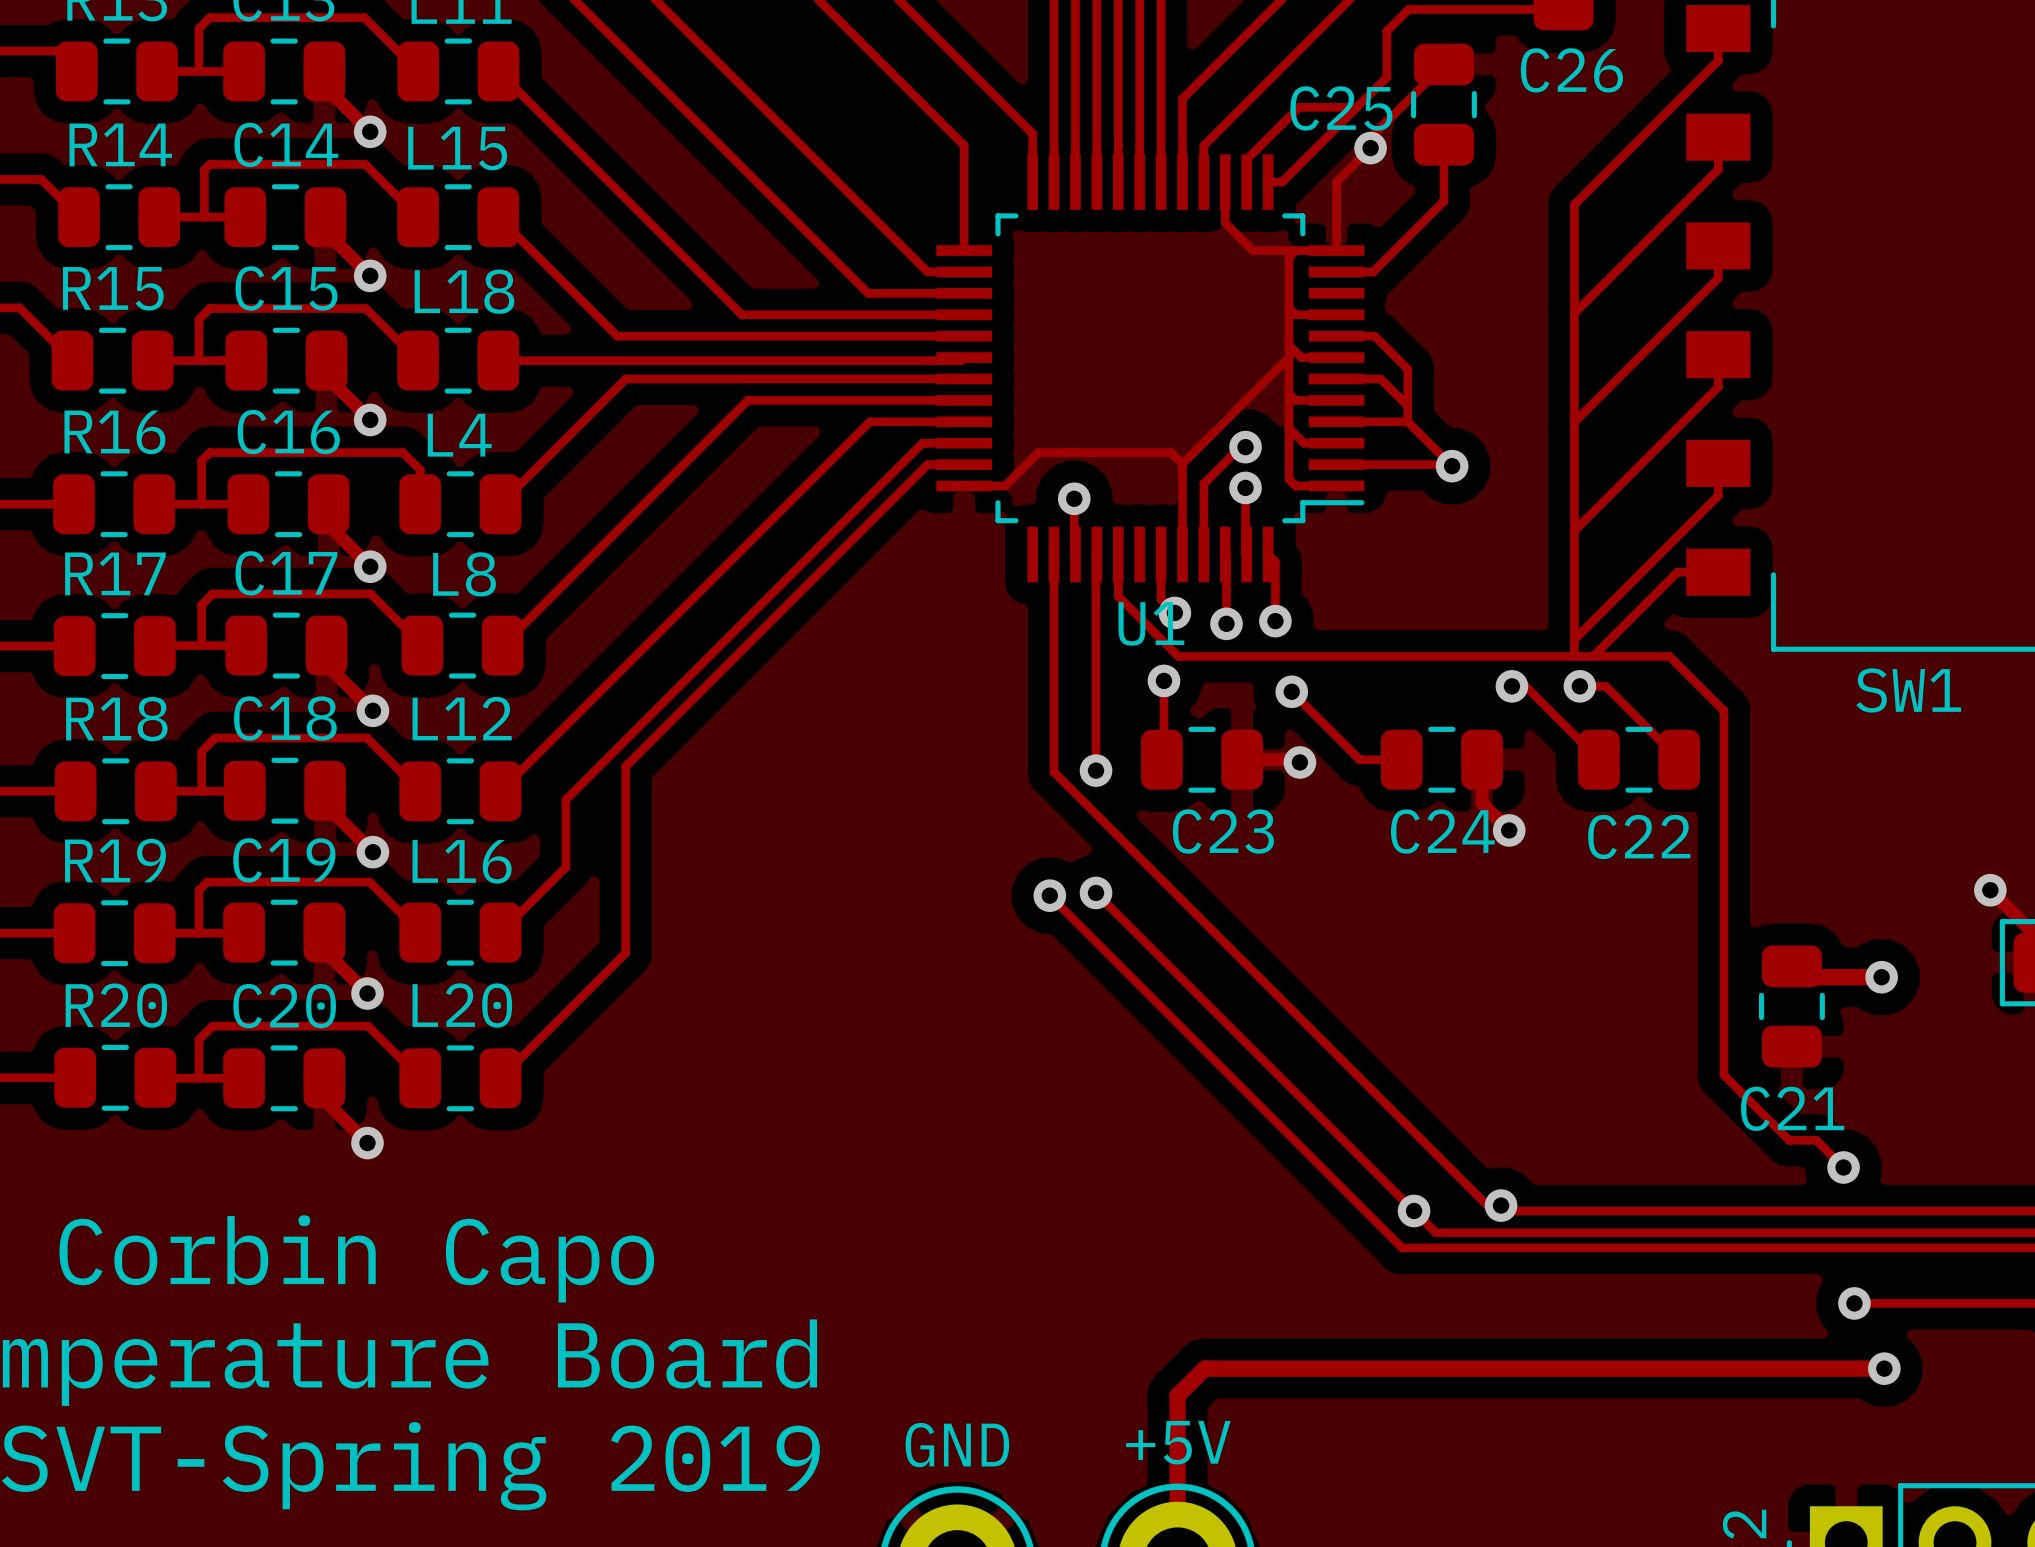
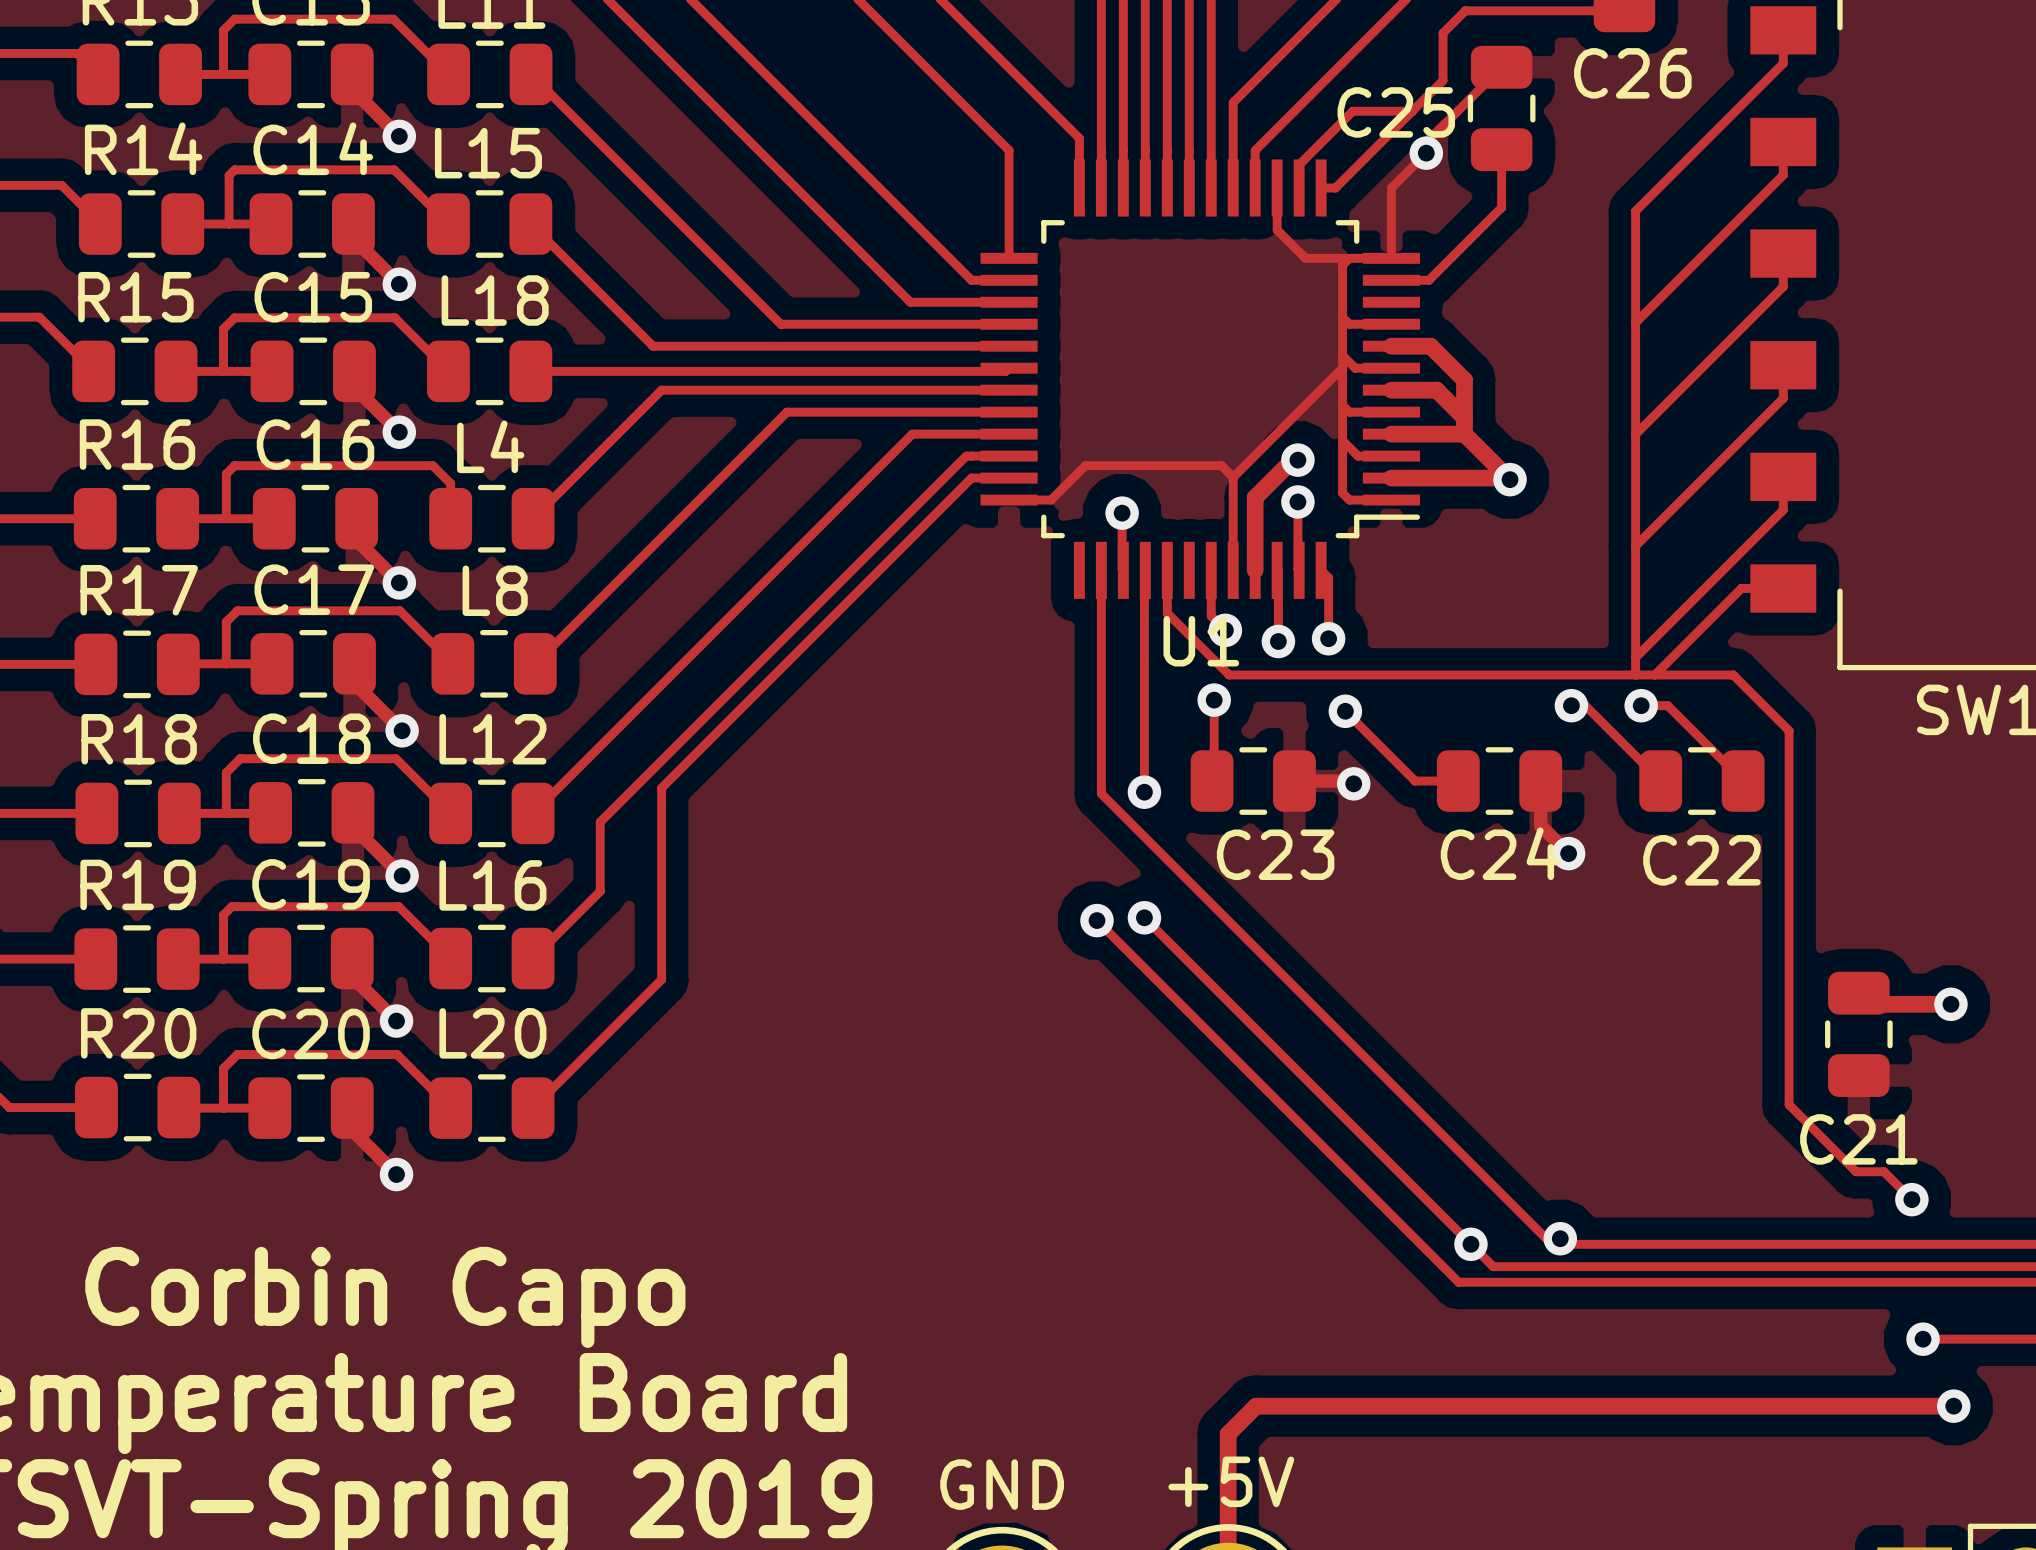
track width: thin (1336, 336) (1374, 336) (1407, 369) (1407, 421) -> thick (1391, 346) (1430, 346) (1464, 380) (1464, 434)
track width: thin (1336, 379) (1380, 379) (1407, 406) -> thick (1391, 390) (1436, 390) (1464, 417)
track width: thin (1336, 421) (1407, 421) -> thick (1391, 434) (1464, 434)
track width: thin (1407, 421) (1450, 464) (1336, 464) -> thick (1464, 434) (1508, 478) (1391, 478)
track width: thin (1240, 447) (1203, 483) (1203, 554) -> thick (1292, 460) (1255, 497) (1255, 570)

